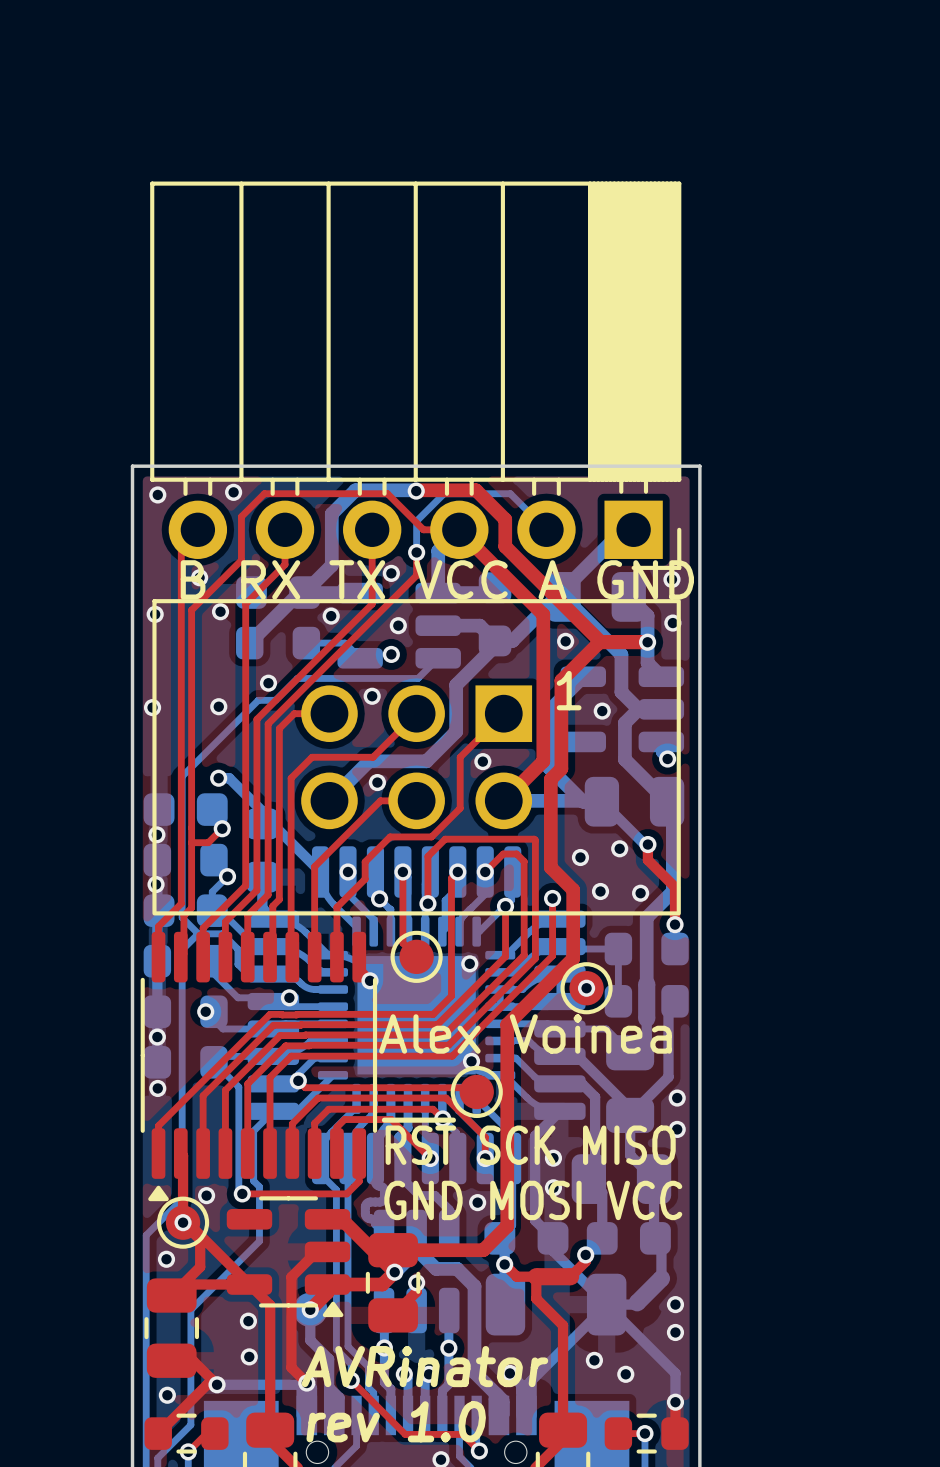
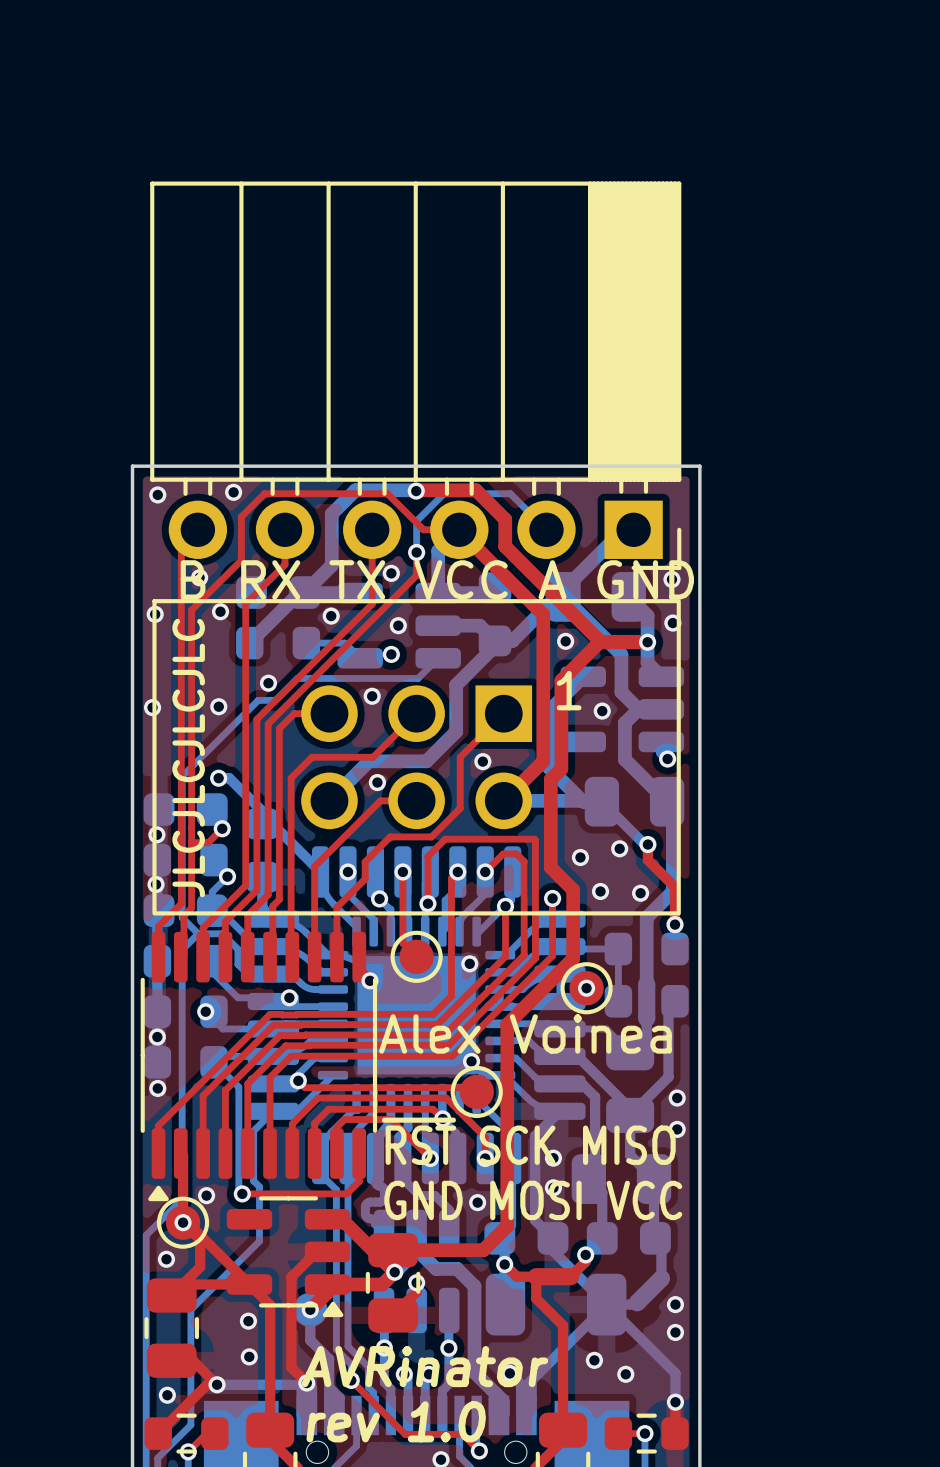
text: none -> JLCJLCJLCJLC (188, 758)

